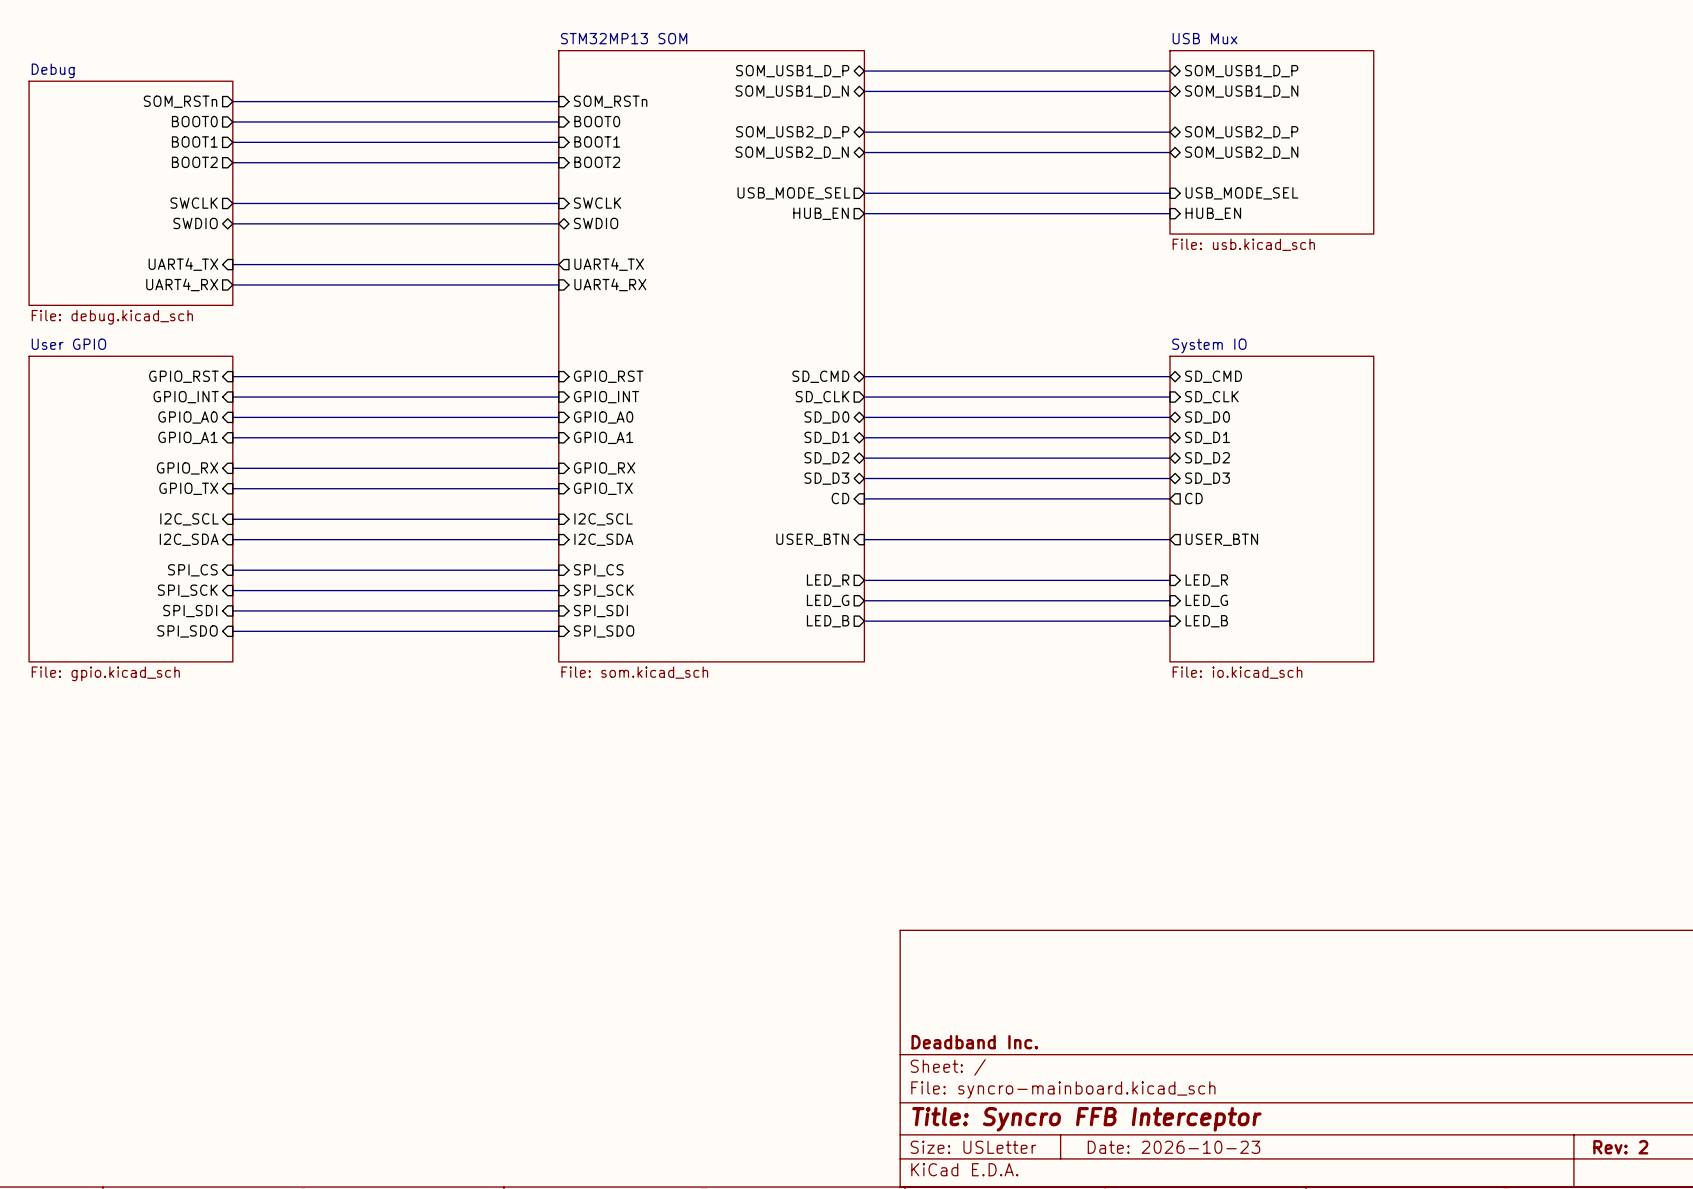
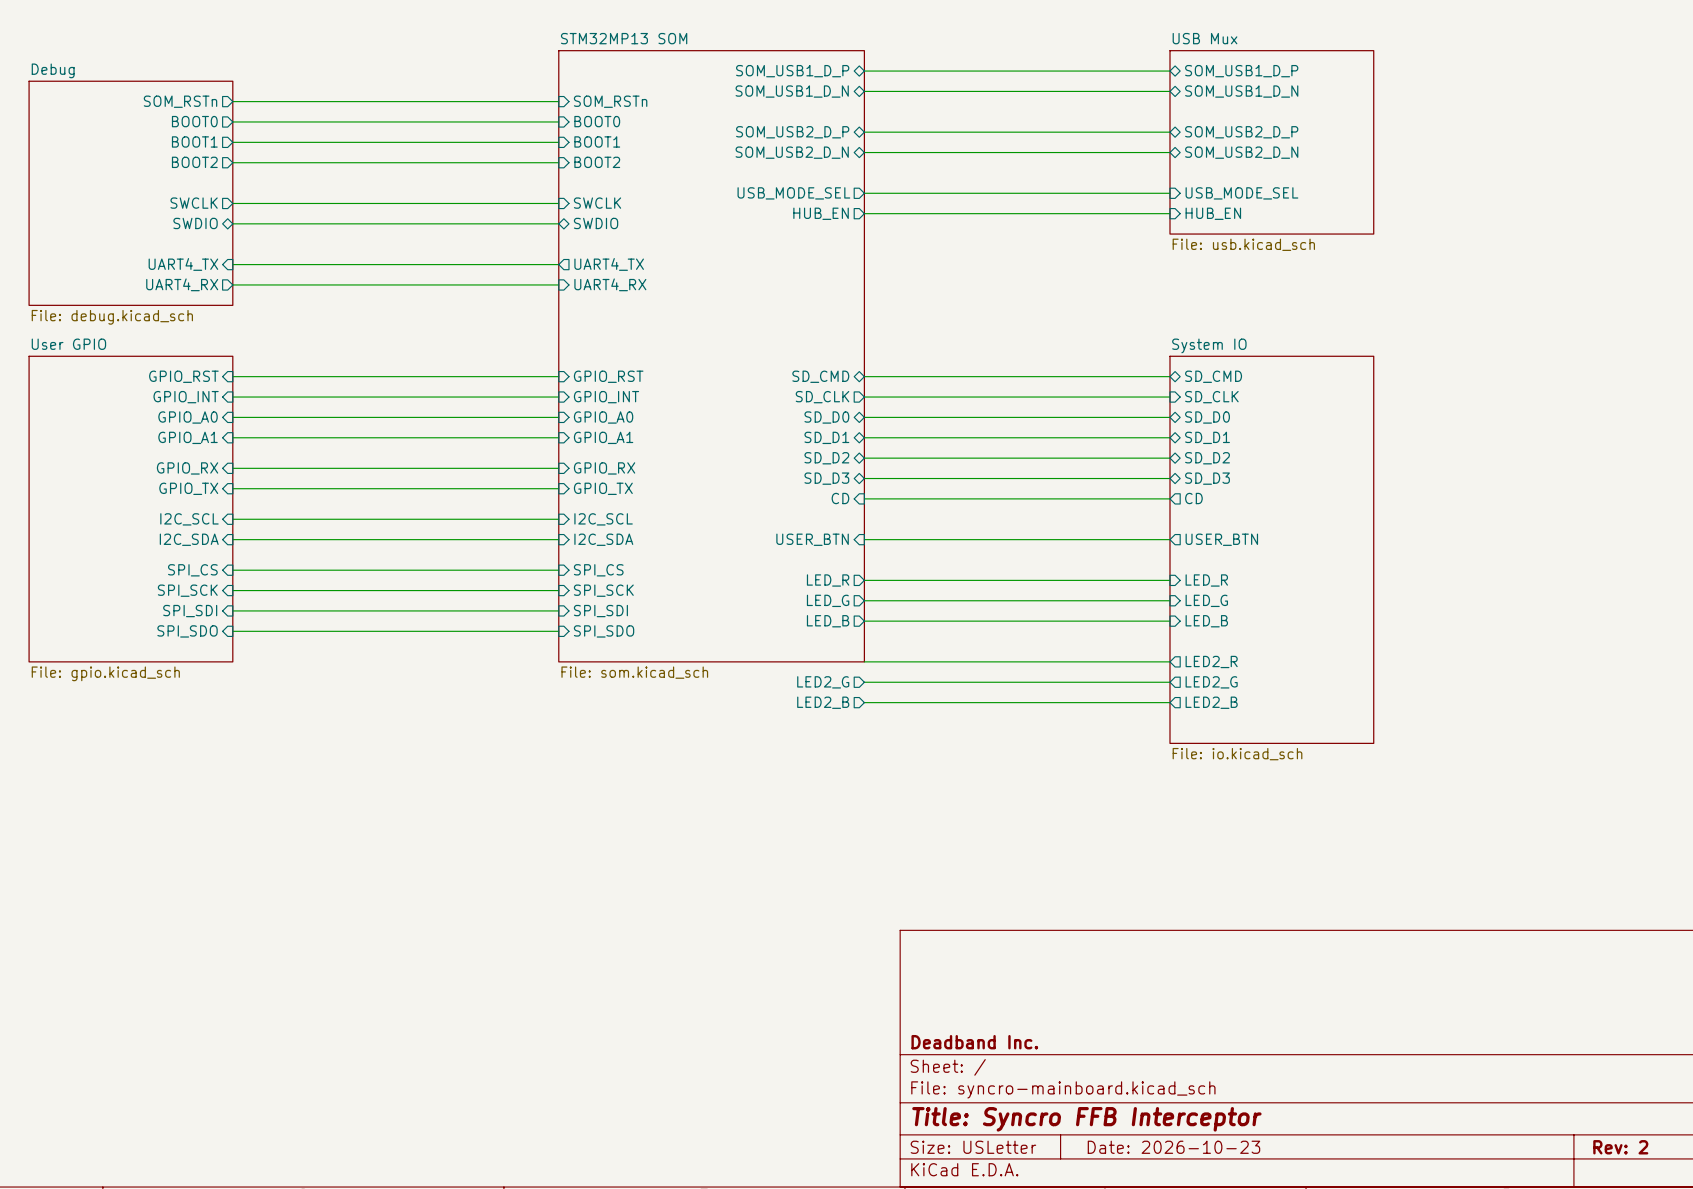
sheet System IO: File: io.kicad_sch (1271, 509) -> none
sheet System IO: none -> File: io.kicad_sch (1271, 549)
wire: none -> (864, 661) (1169, 661)
sheet pin: none -> LED2_R (1211, 661)
sheet pin: none -> LED2_G (823, 682)
wire: none -> (864, 682) (1169, 682)
sheet pin: none -> LED2_G (1211, 682)
sheet pin: none -> LED2_B (823, 702)
wire: none -> (864, 702) (1169, 702)
sheet pin: none -> LED2_B (1211, 702)

